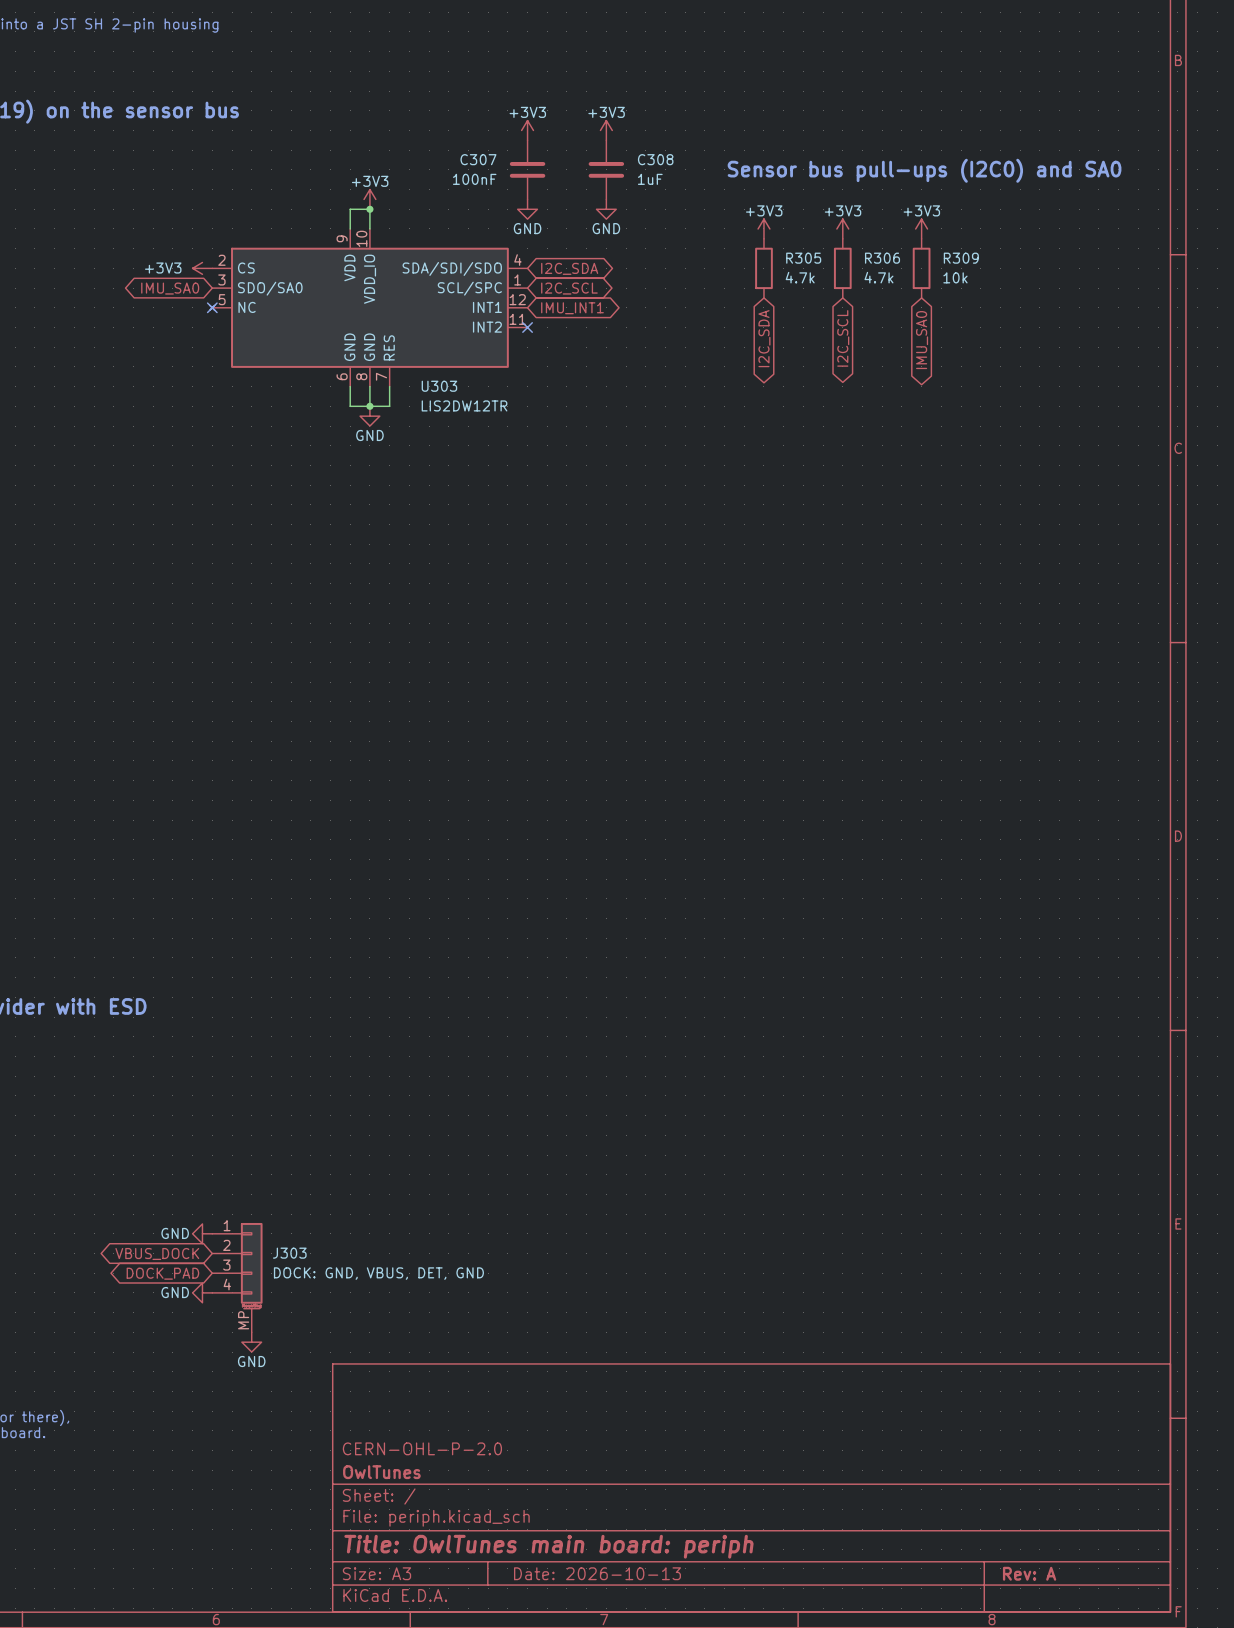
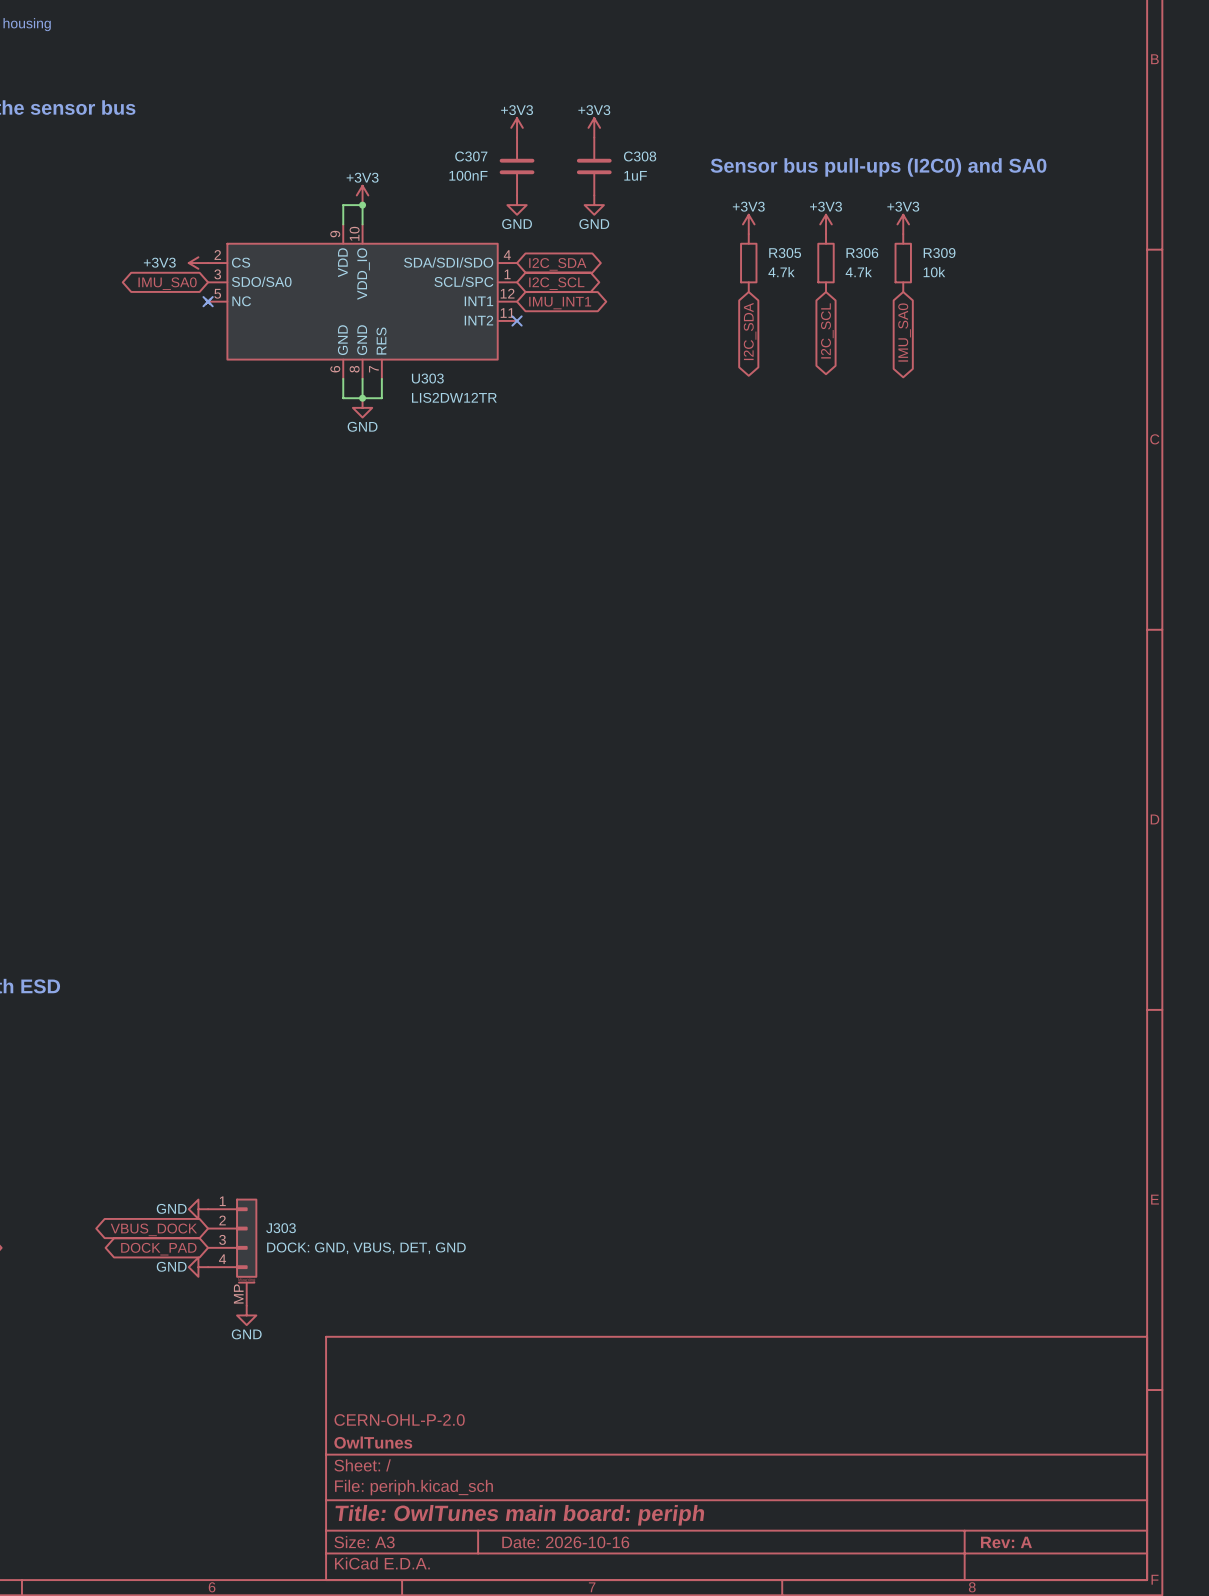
title block: Date: 2026-10-13 (597, 1573) -> Date: 2026-10-16 (565, 1542)

